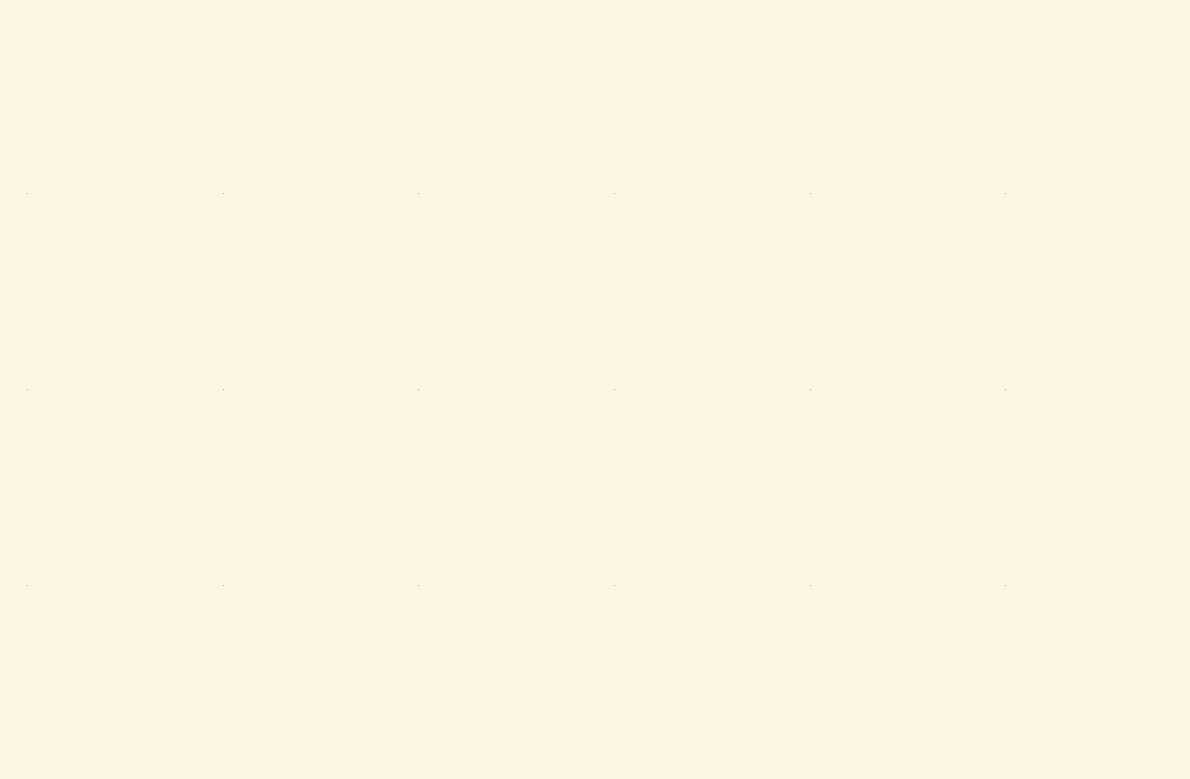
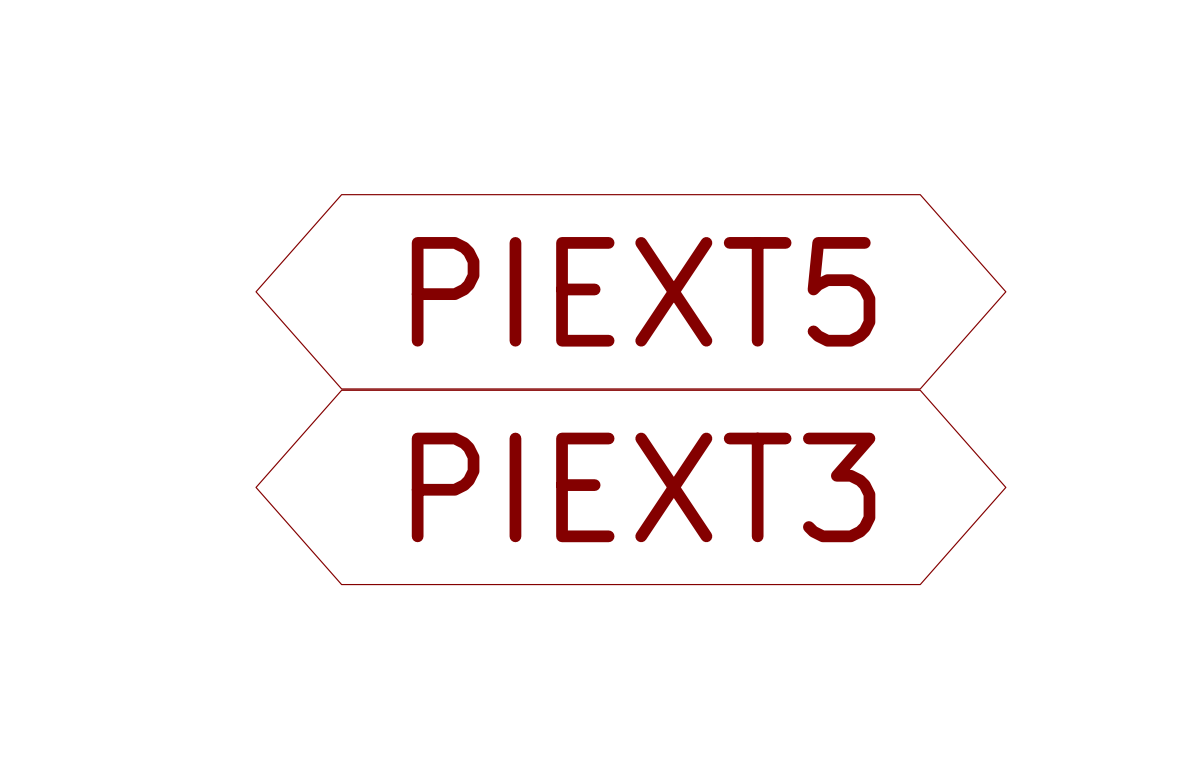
global label: none -> PIEXT5 (643, 291)
global label: none -> PIEXT3 (643, 487)

